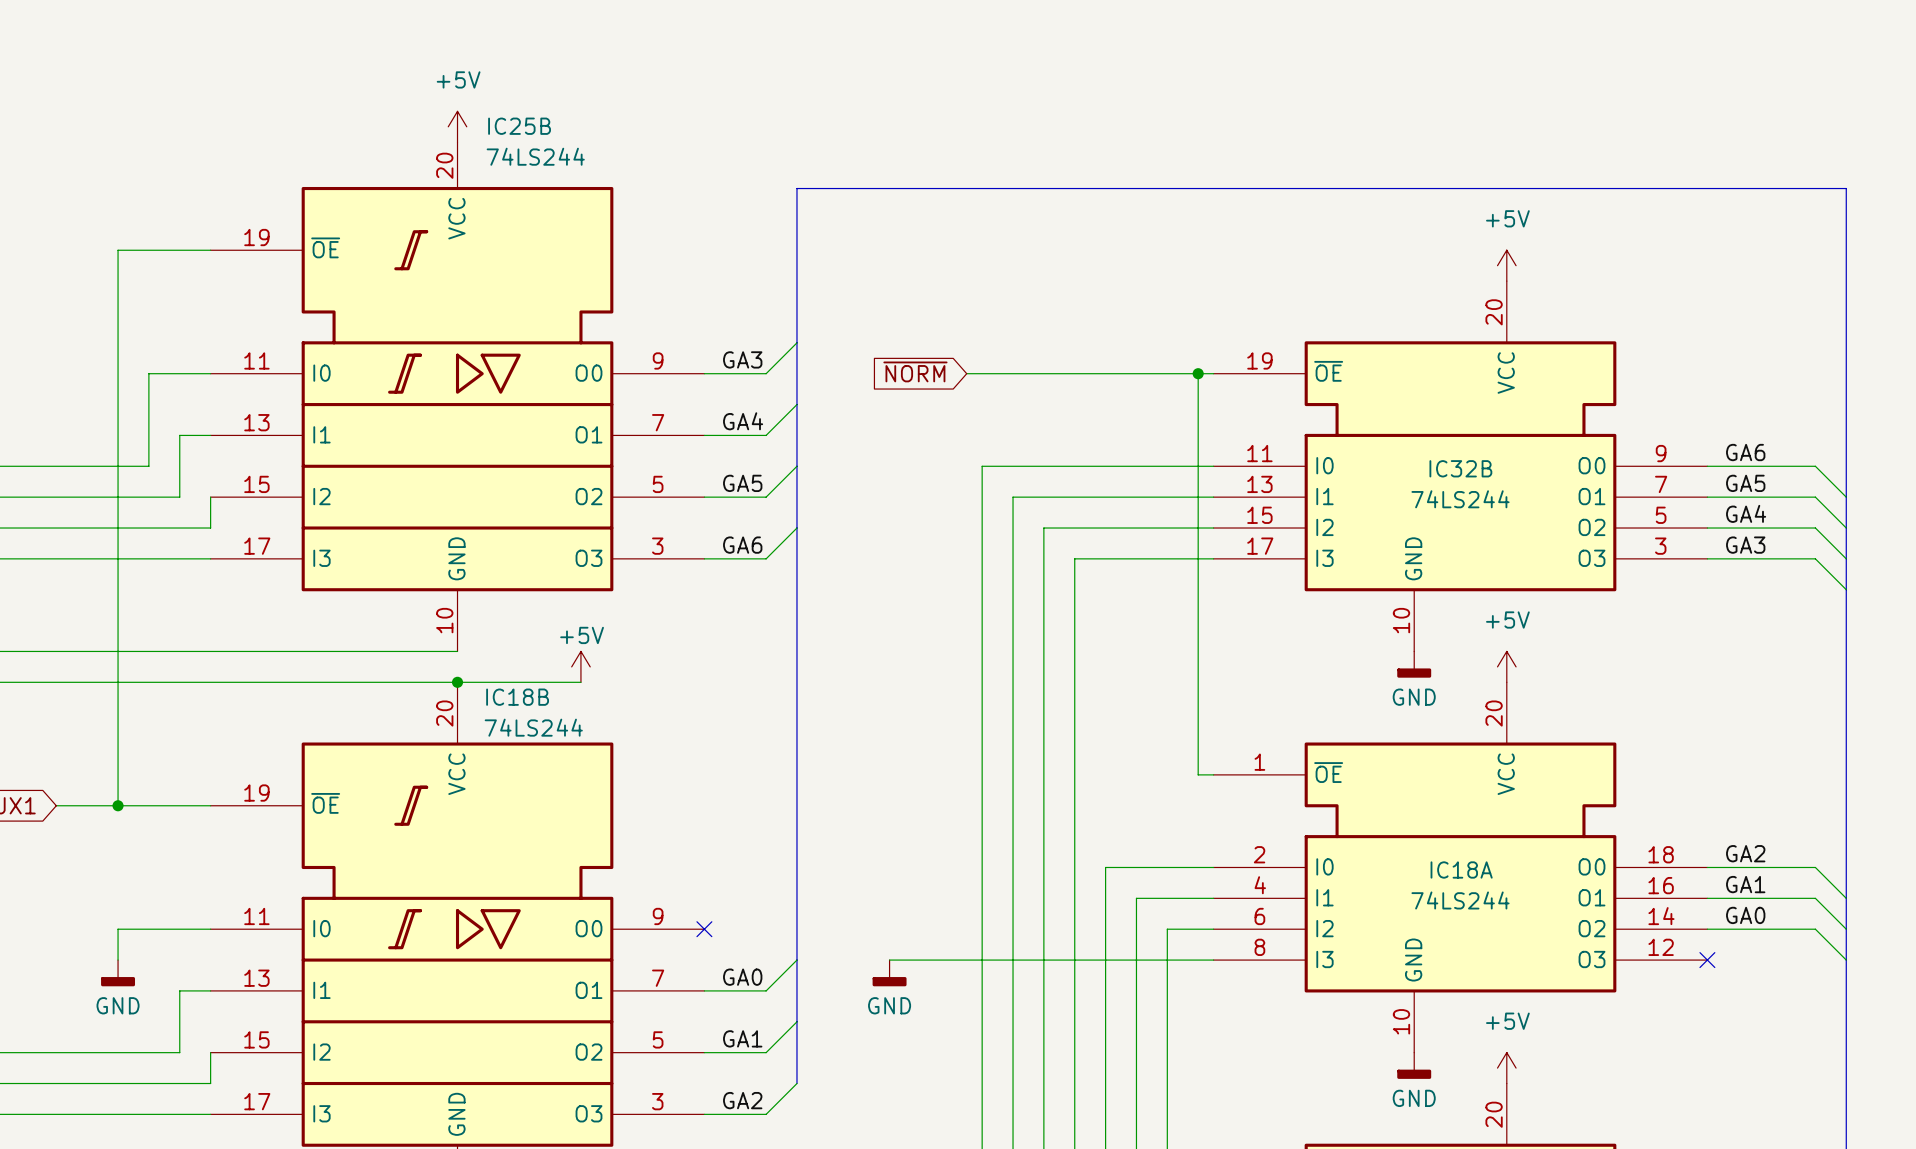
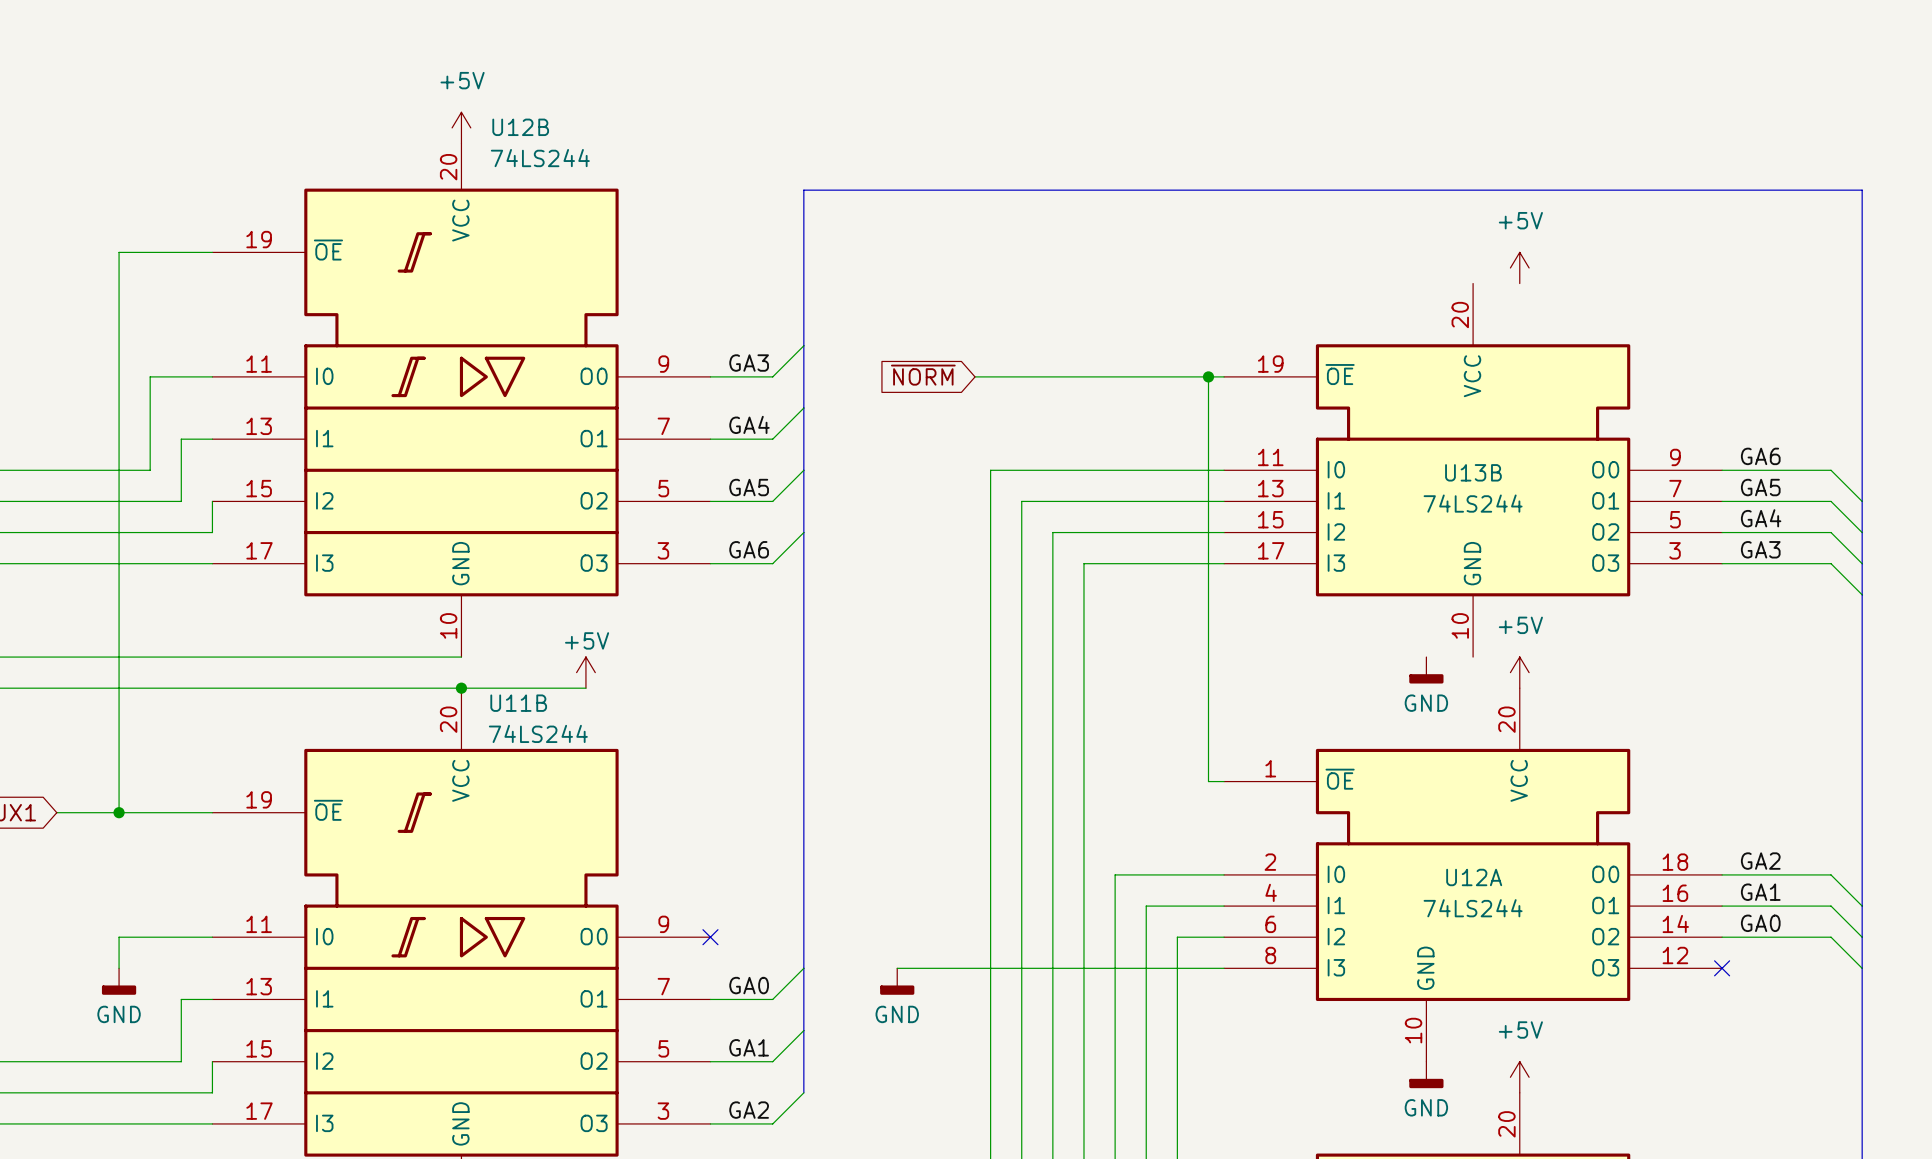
IC25B name: IC25B (519, 126) -> U12B (520, 127)
IC32B: 74LS244 (1460, 466) -> none
U13B: none -> 74LS244 (1473, 470)
IC18B name: IC18B (517, 697) -> U11B (518, 703)
IC18A name: IC18A (1461, 869) -> U12A (1474, 877)

